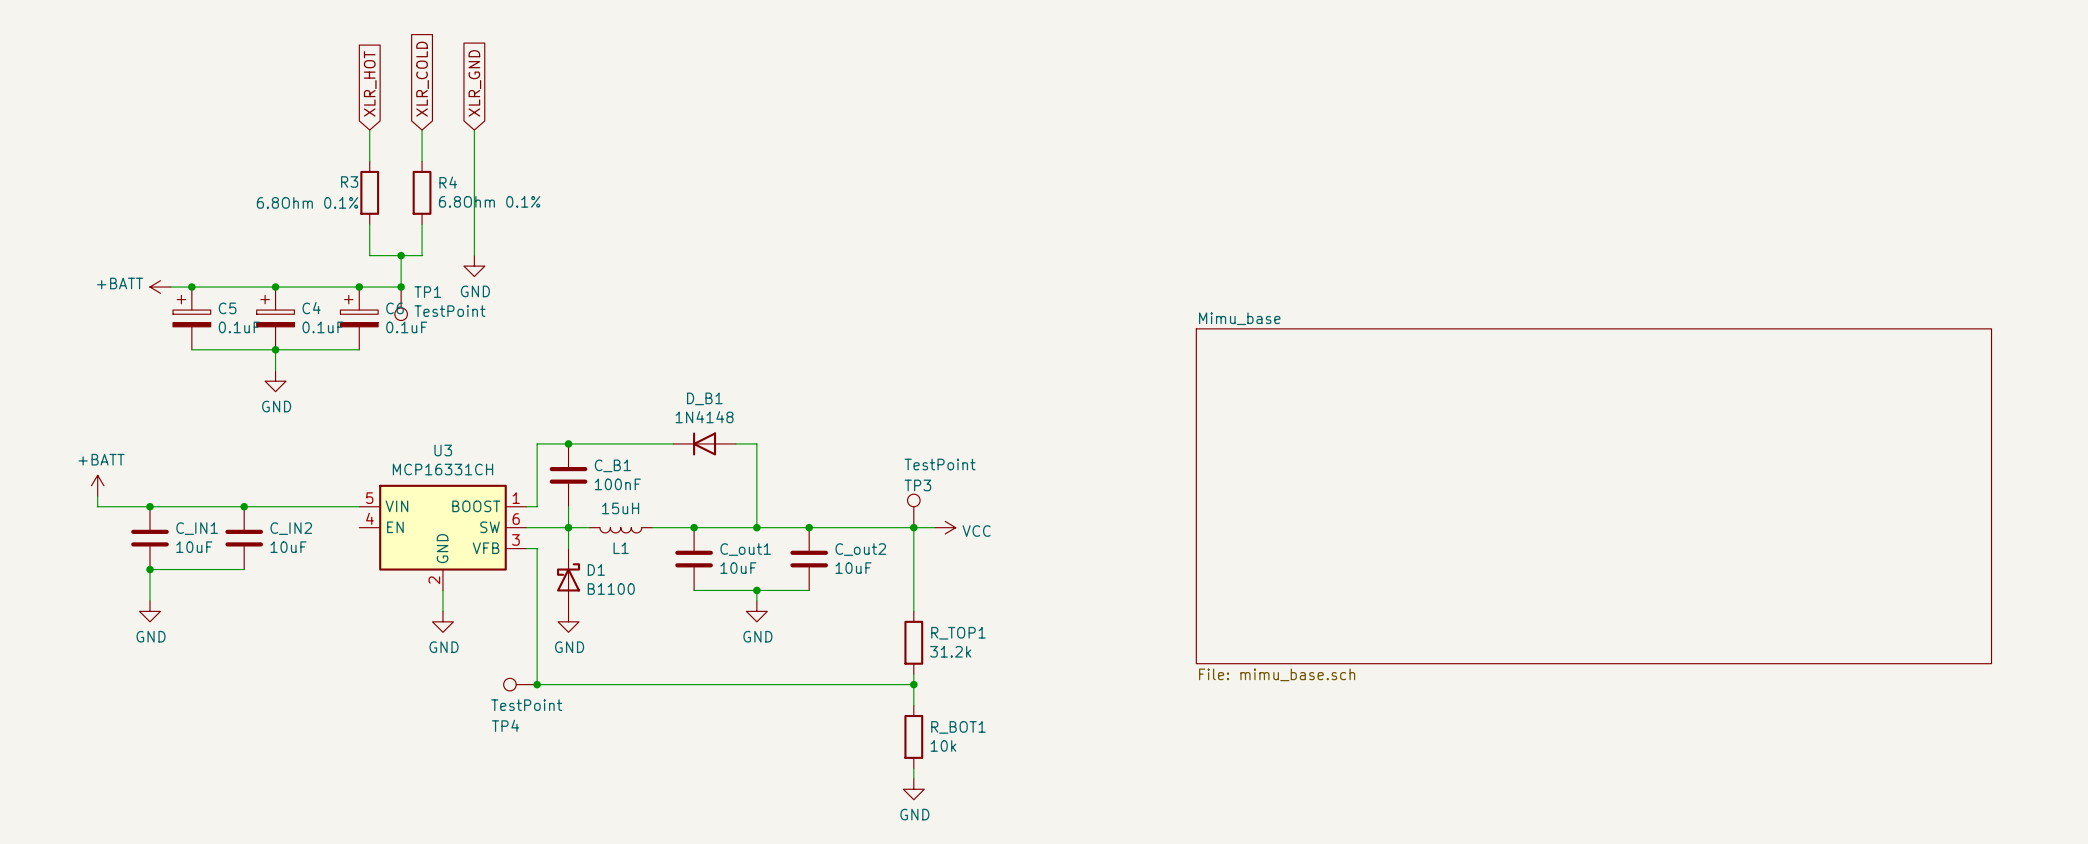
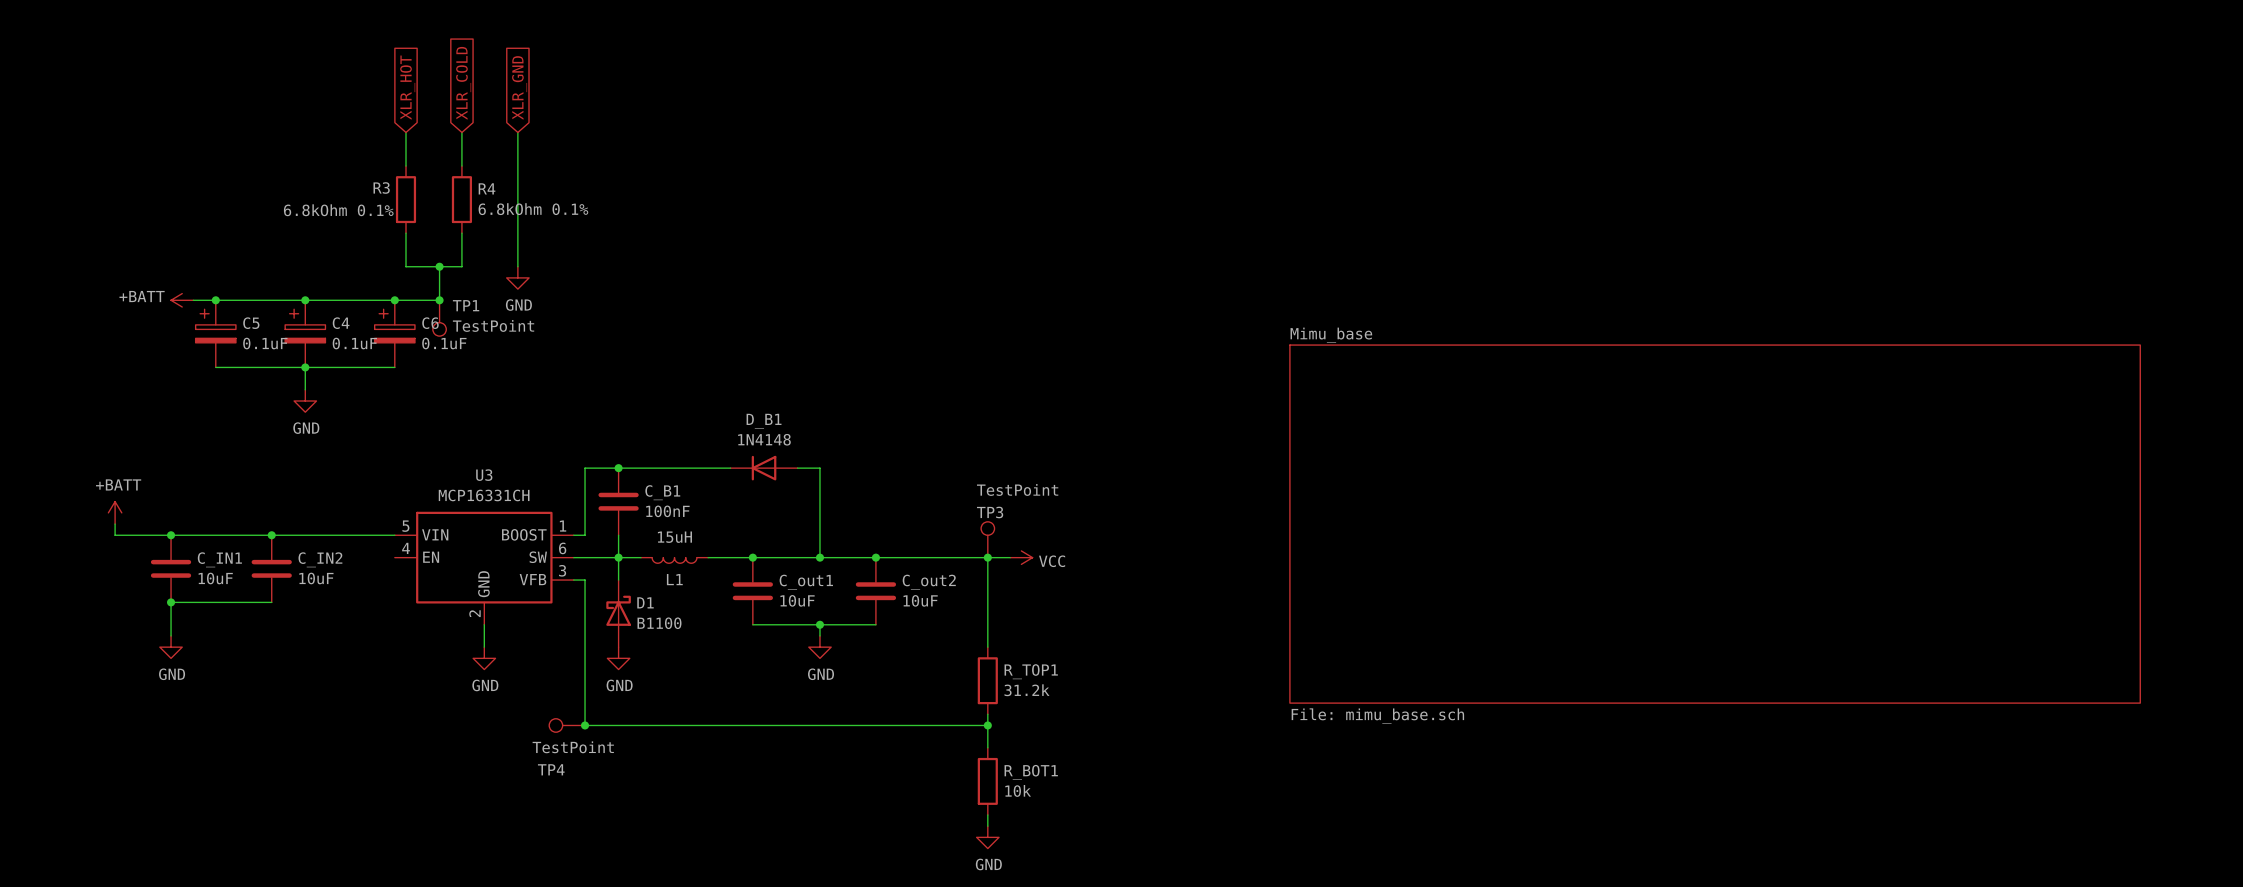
R4 value: 6.8Ohm 0.1% (489, 201) -> 6.8kOhm 0.1% (533, 209)
R3 value: 6.8Ohm 0.1% (307, 202) -> 6.8kOhm 0.1% (338, 210)

